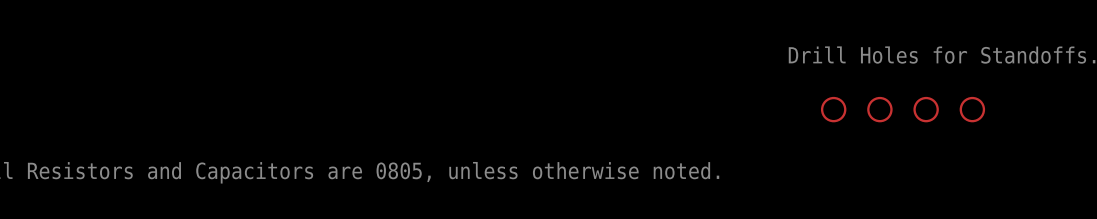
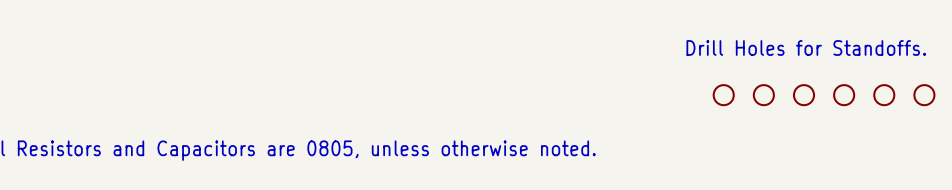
part: none -> (884, 95)
part: none -> (924, 95)

